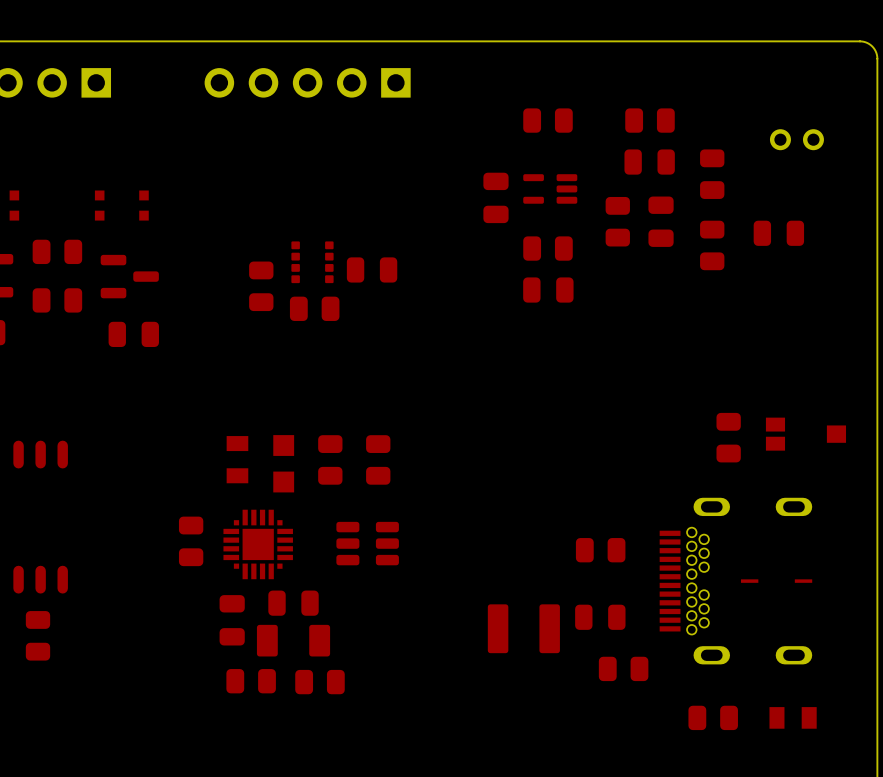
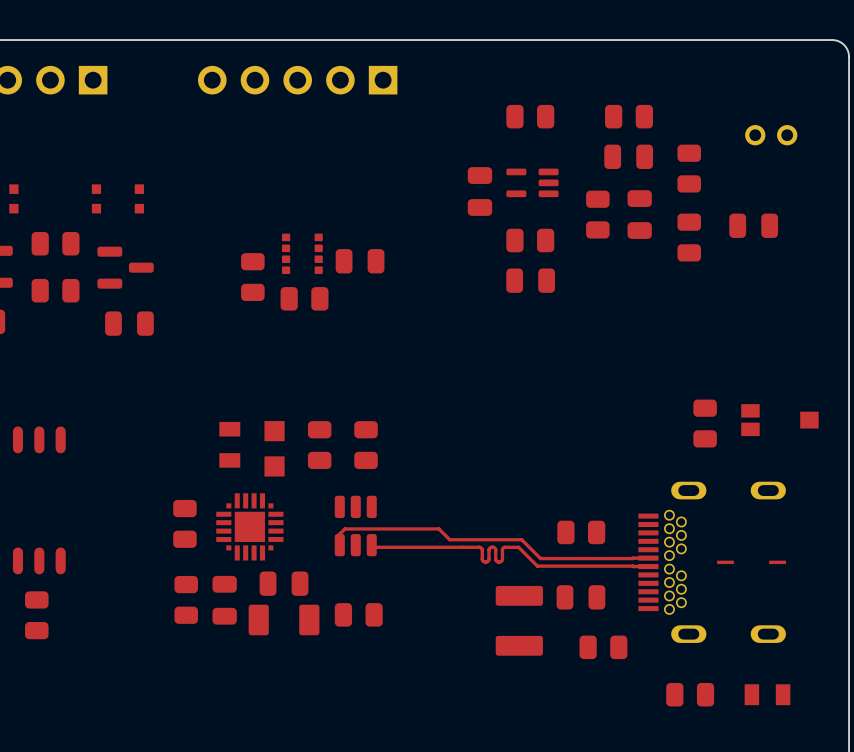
part rotation: 0° (367, 543) -> 90° clockwise (355, 526)
top track: none -> (339, 545) (339, 534) (344, 528) (438, 528) (449, 539) (521, 539) (540, 558) (648, 558)
top track: none -> (371, 545) (373, 547) (479, 547) (482, 549) (482, 560) (484, 561) (488, 560) (490, 547) (495, 548) (495, 559) (499, 561) (502, 559) (503, 547) (518, 547) (537, 566) (648, 566)
part: none -> (186, 599)
part rotation: 0° (523, 628) -> 90° clockwise (519, 620)
part: none -> (358, 614)
part: (251, 681) -> none
part: (319, 682) -> none

